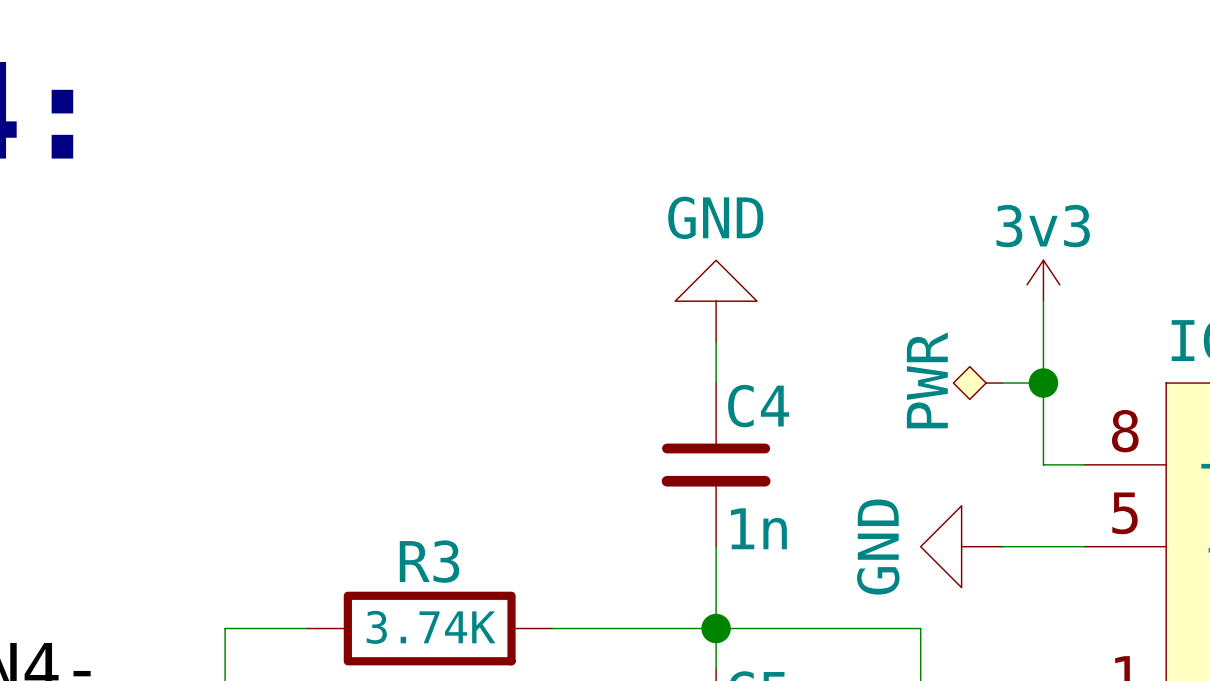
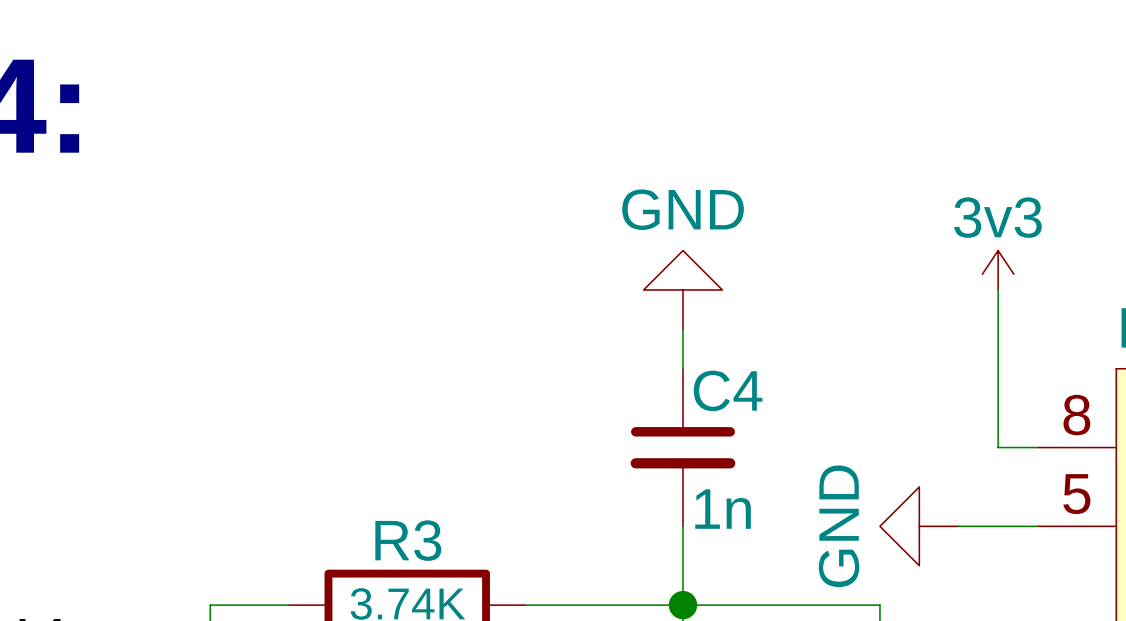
power symbol: PWR (977, 383) -> none
wire: (1002, 383) (1043, 383) -> none
junction: (1043, 383) -> none

